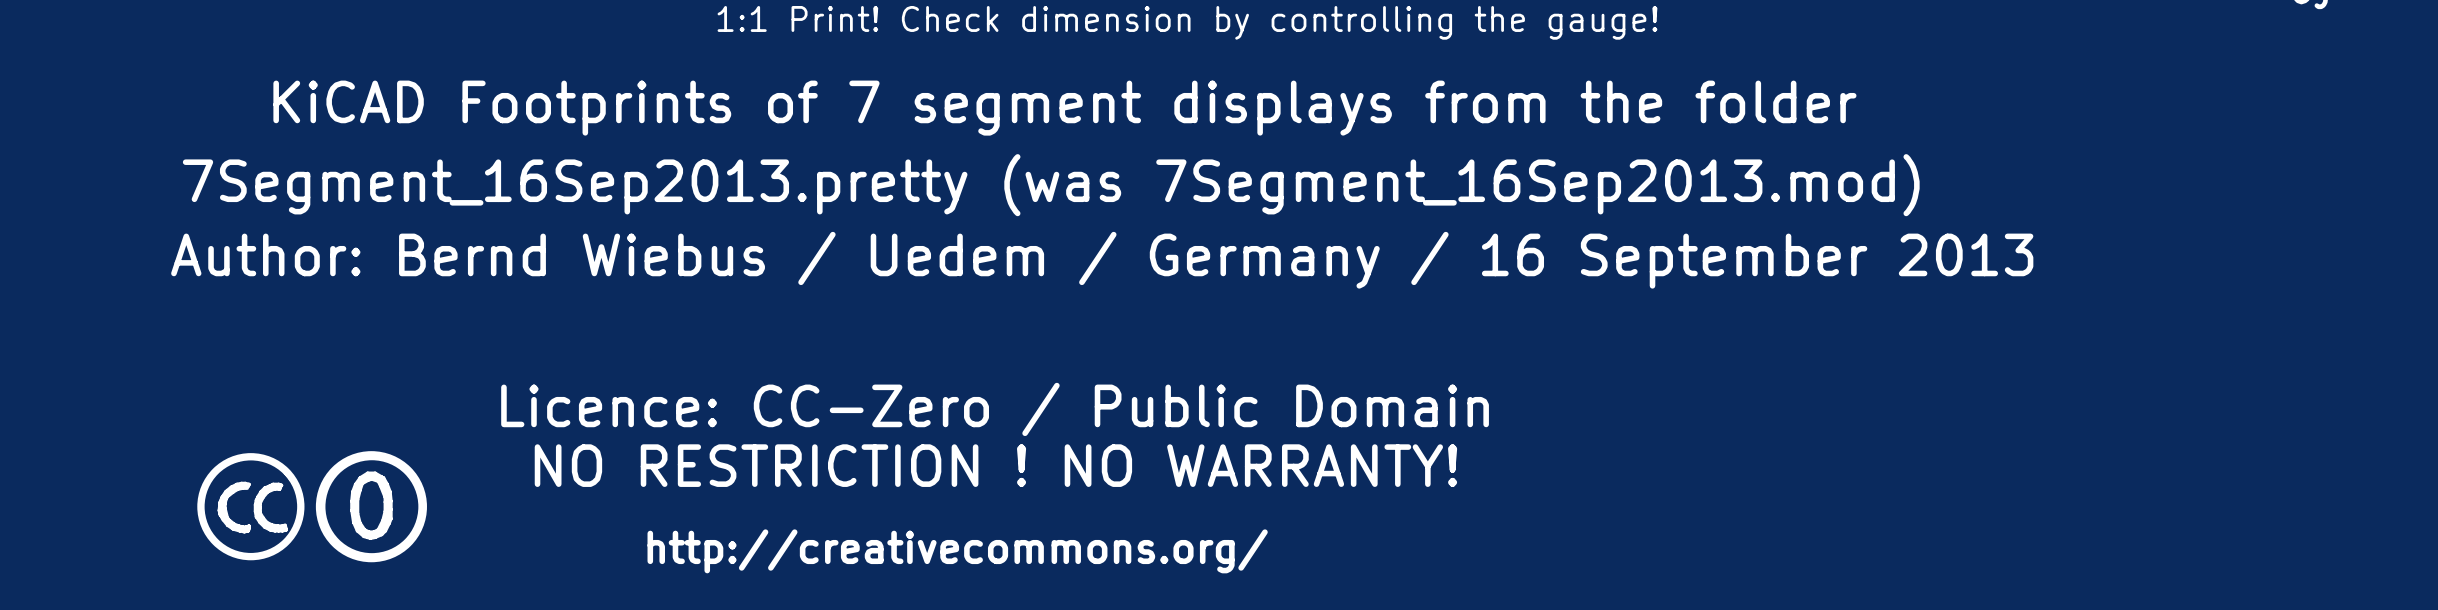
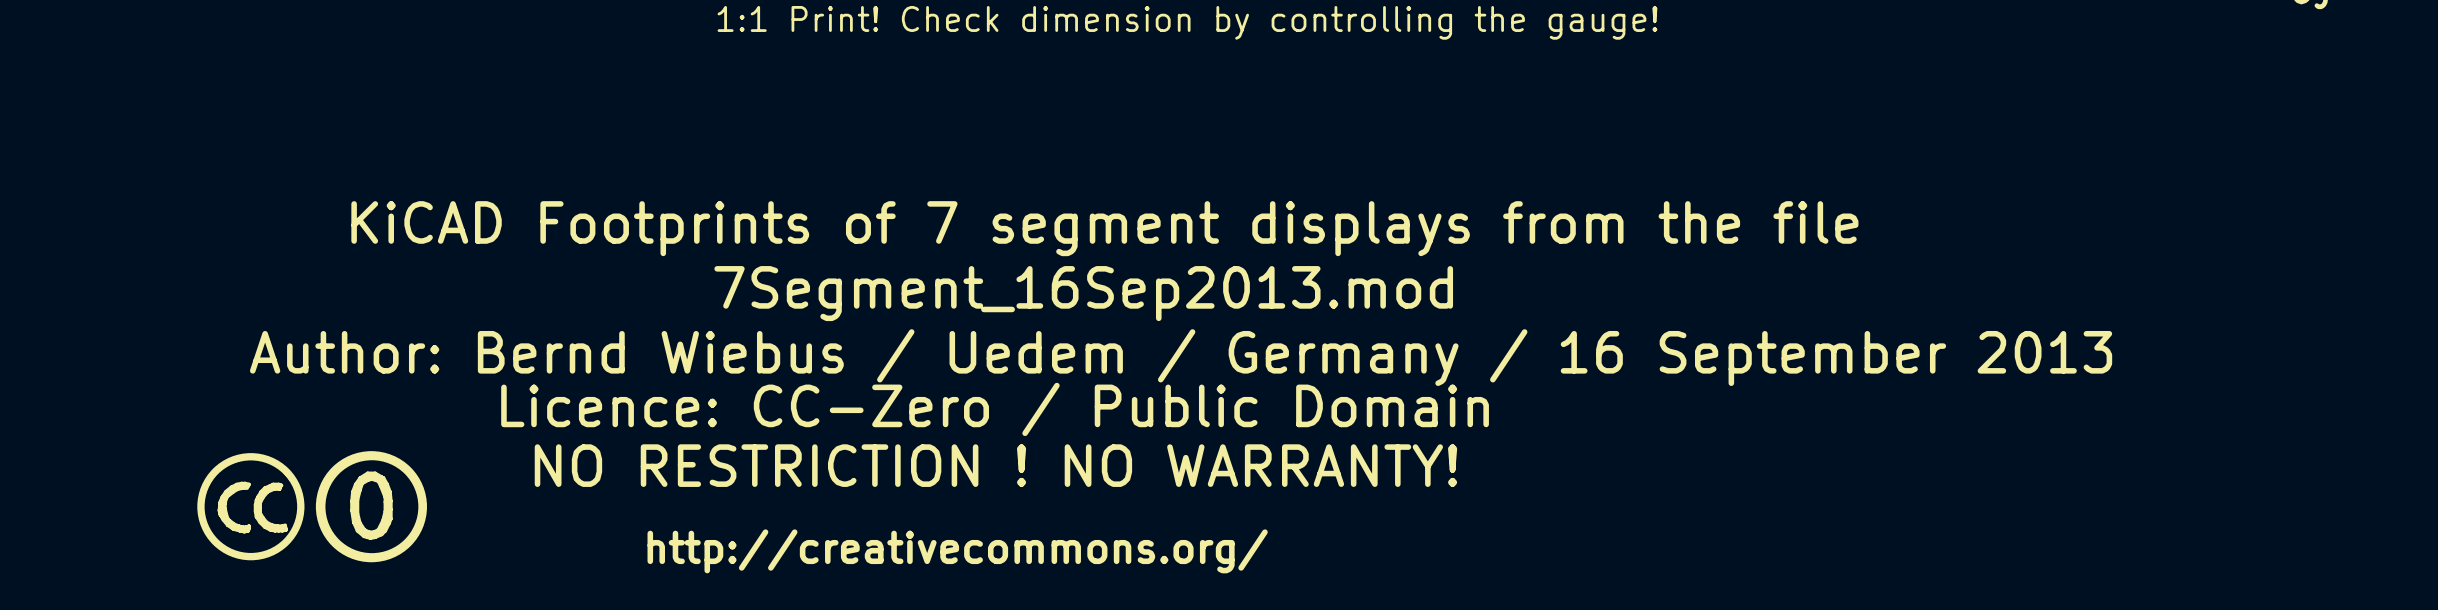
text: KiCAD Footprints of 7 segment displays from the folder (1064, 108) -> none
text: 7Segment_16Sep2013.pretty (was 7Segment_16Sep2013.mod) (1051, 185) -> none
text: none -> KiCAD Footprints of 7 segment displays from the file (1104, 228)
text position: Author: Bernd Wiebus / Uedem / Germany / 16 September 2013 (1102, 260) -> Author: Bernd Wiebus / Uedem / Germany / 16 September 2013 (1181, 357)
text: none -> 7Segment_16Sep2013.mod (1083, 293)

